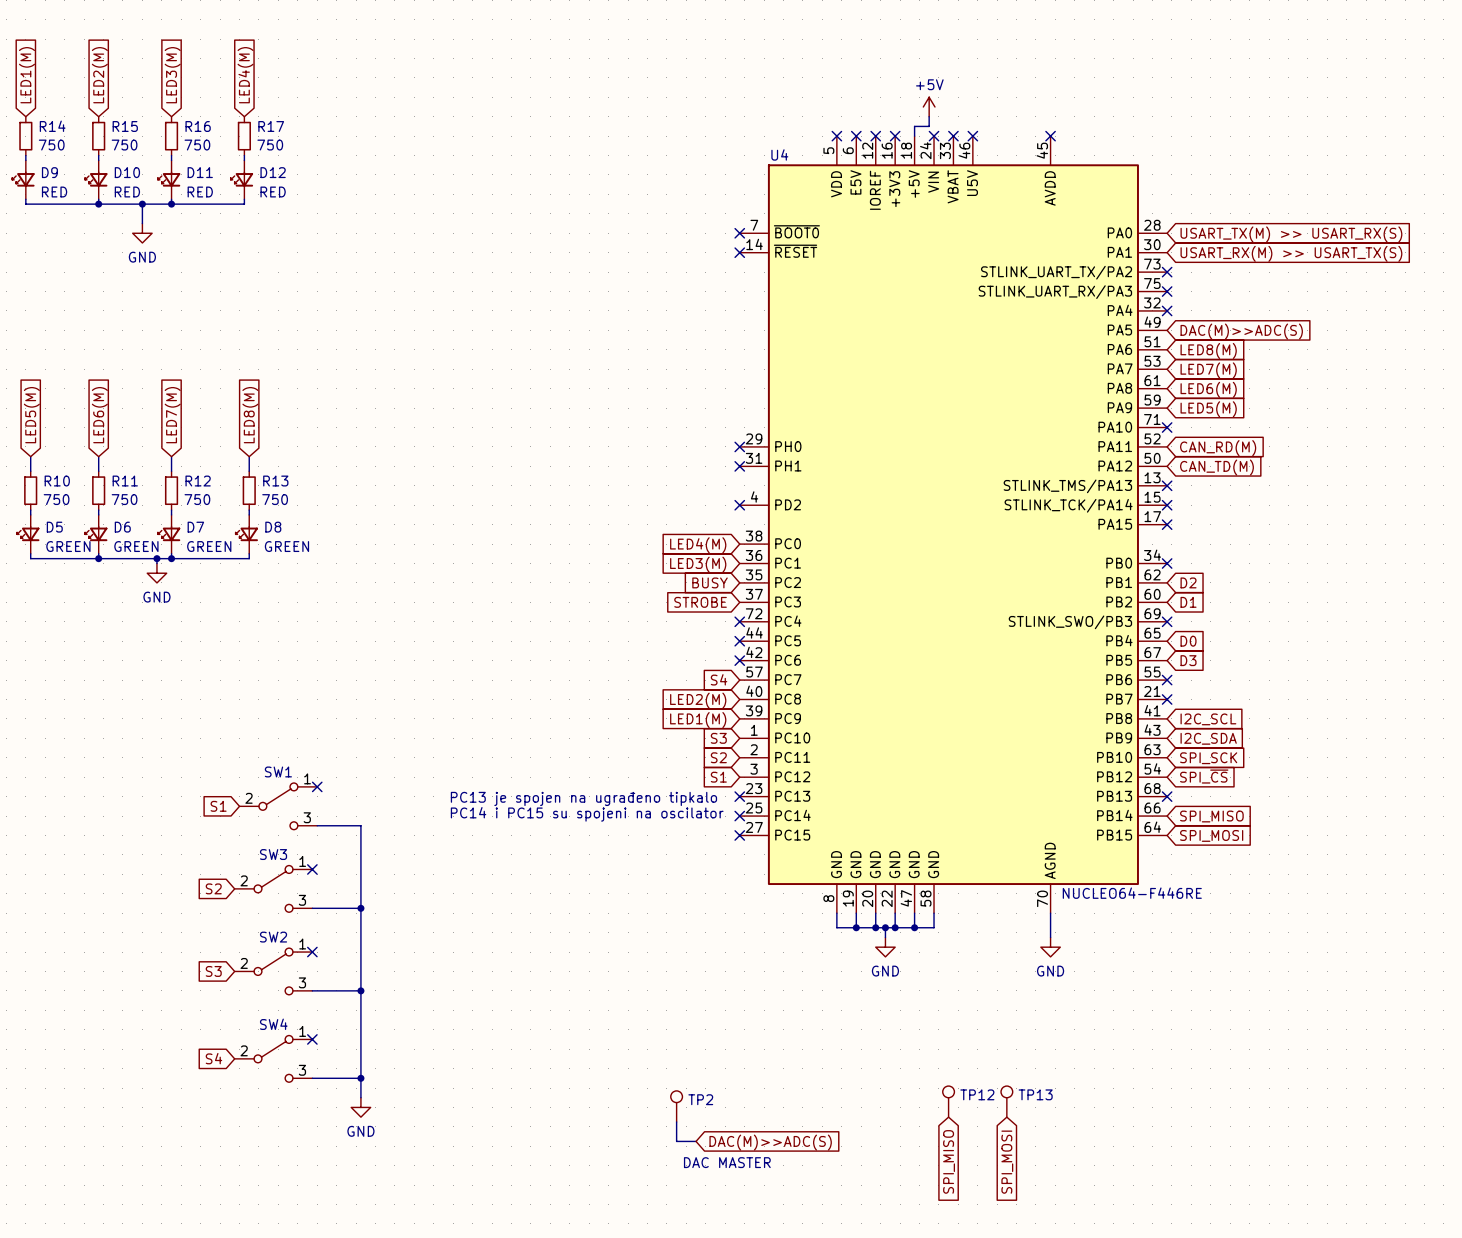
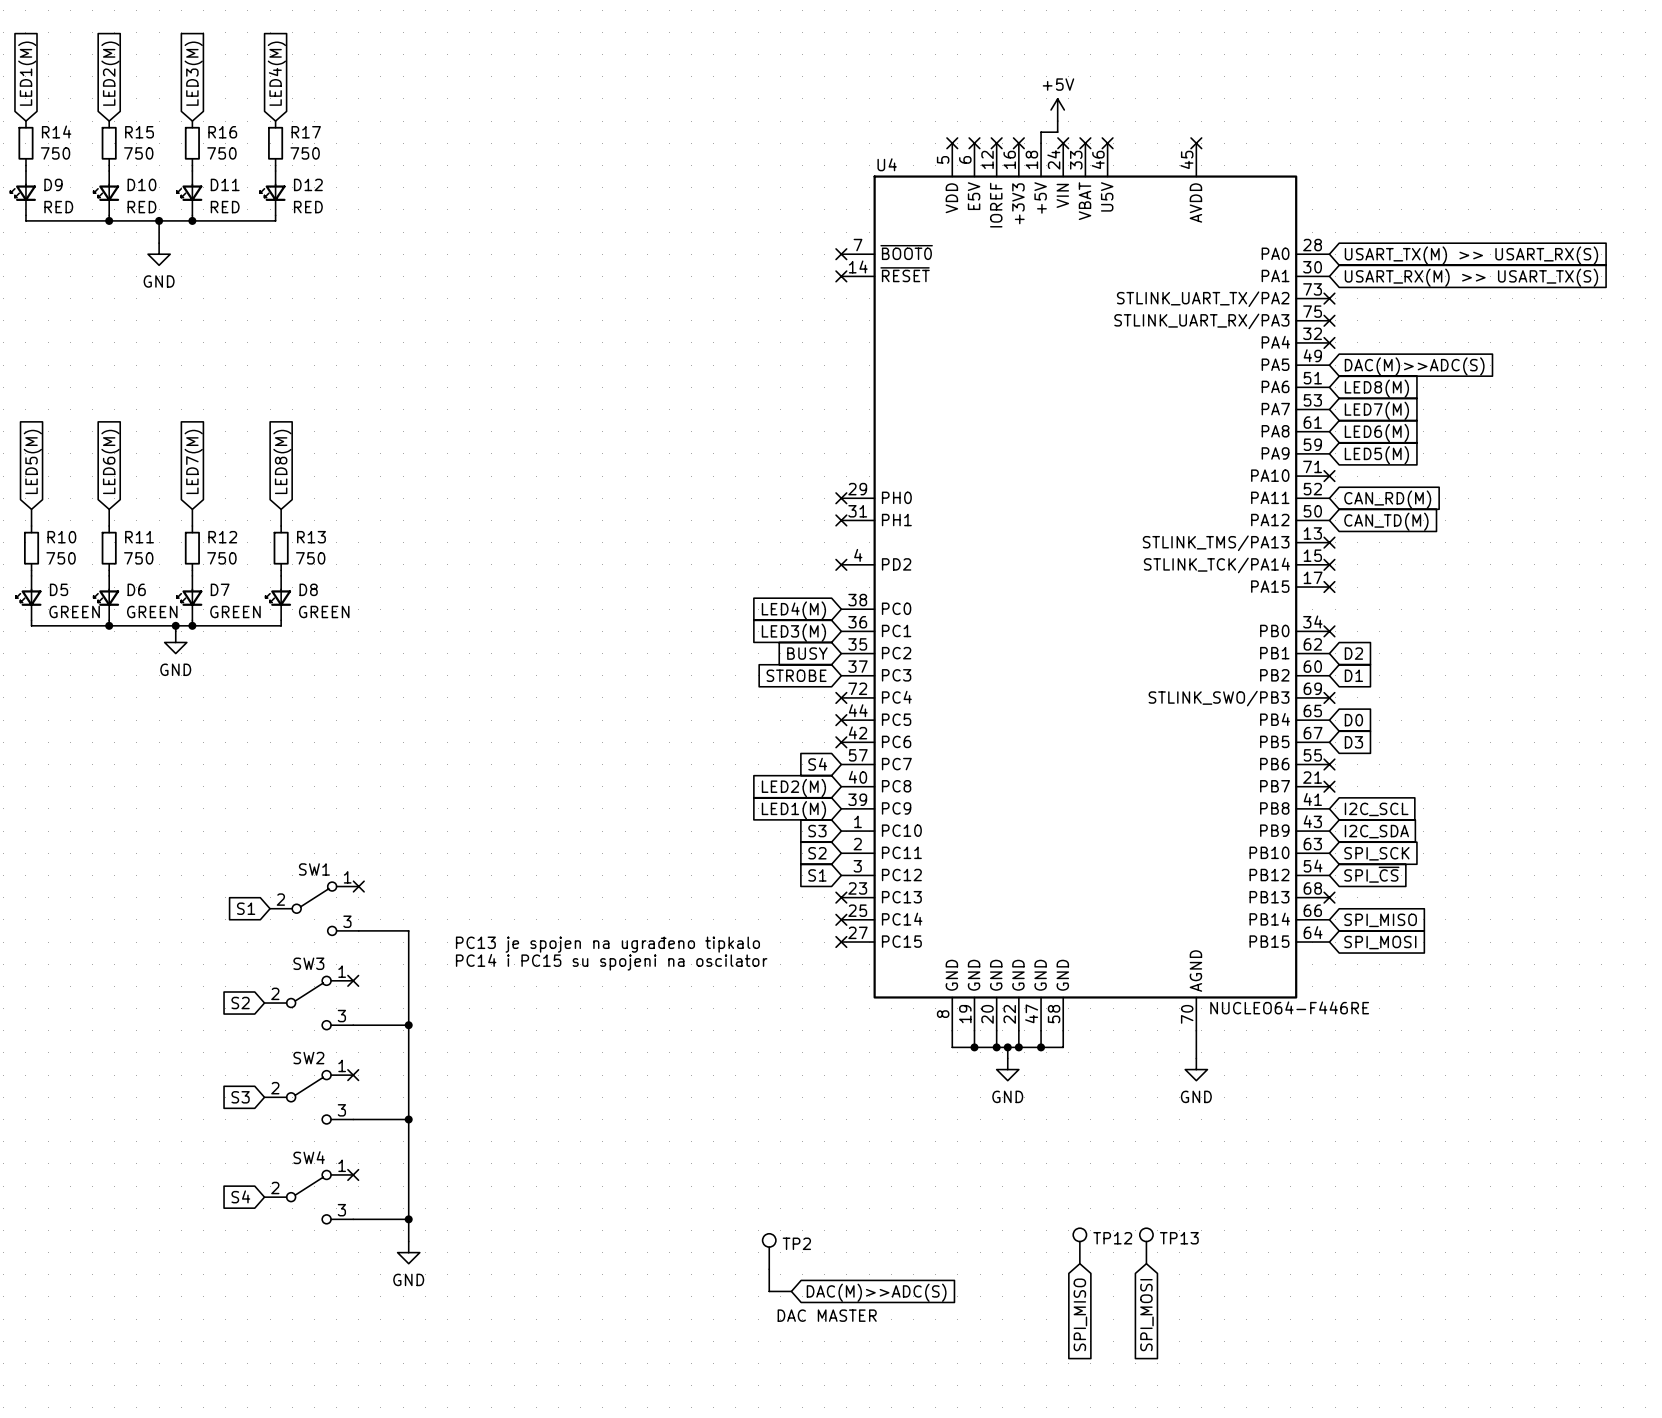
text position: PC13 je spojen na ugrađeno tipkalo (583, 798) -> PC13 je spojen na ugrađeno tipkalo (607, 944)
text position: PC14 i PC15 su spojeni na oscilator (587, 814) -> PC14 i PC15 su spojeni na oscilator (611, 962)

